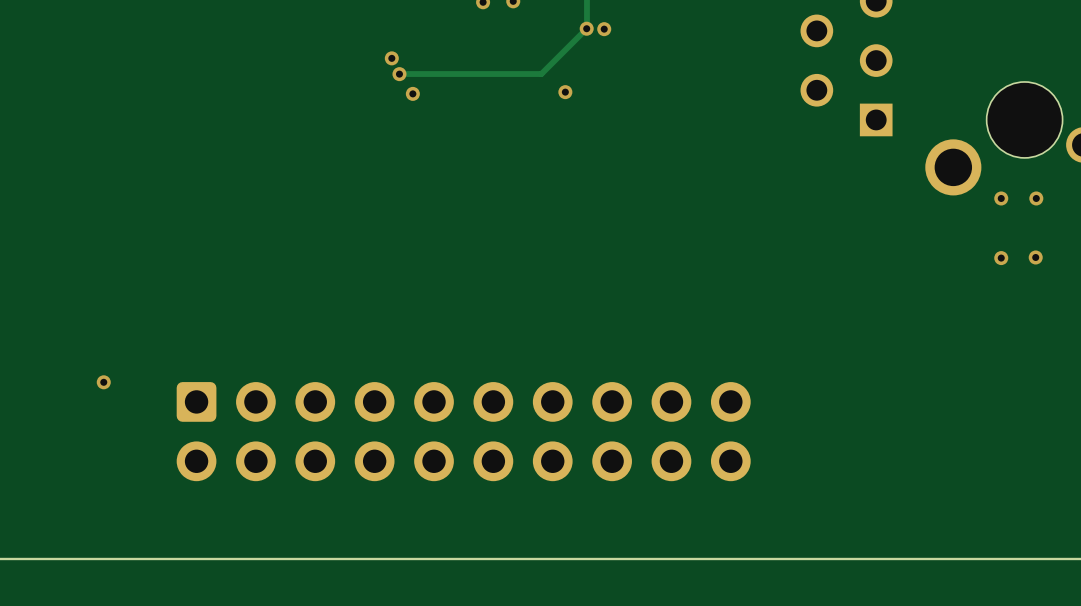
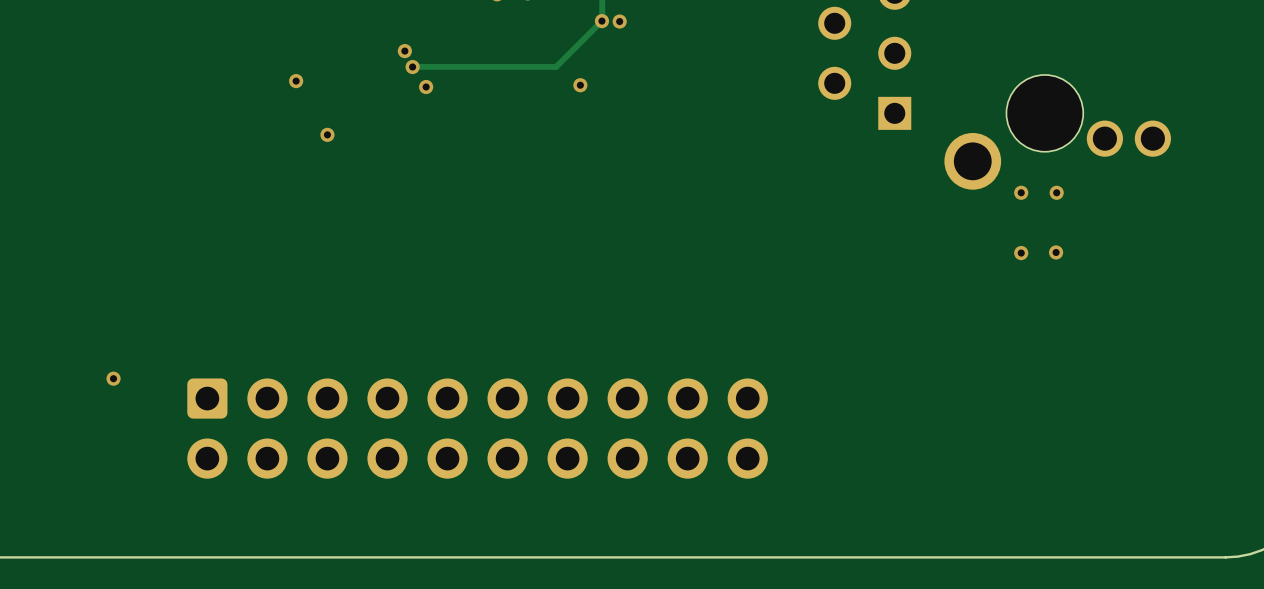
via: none -> (296, 81)
via: none -> (327, 134)

